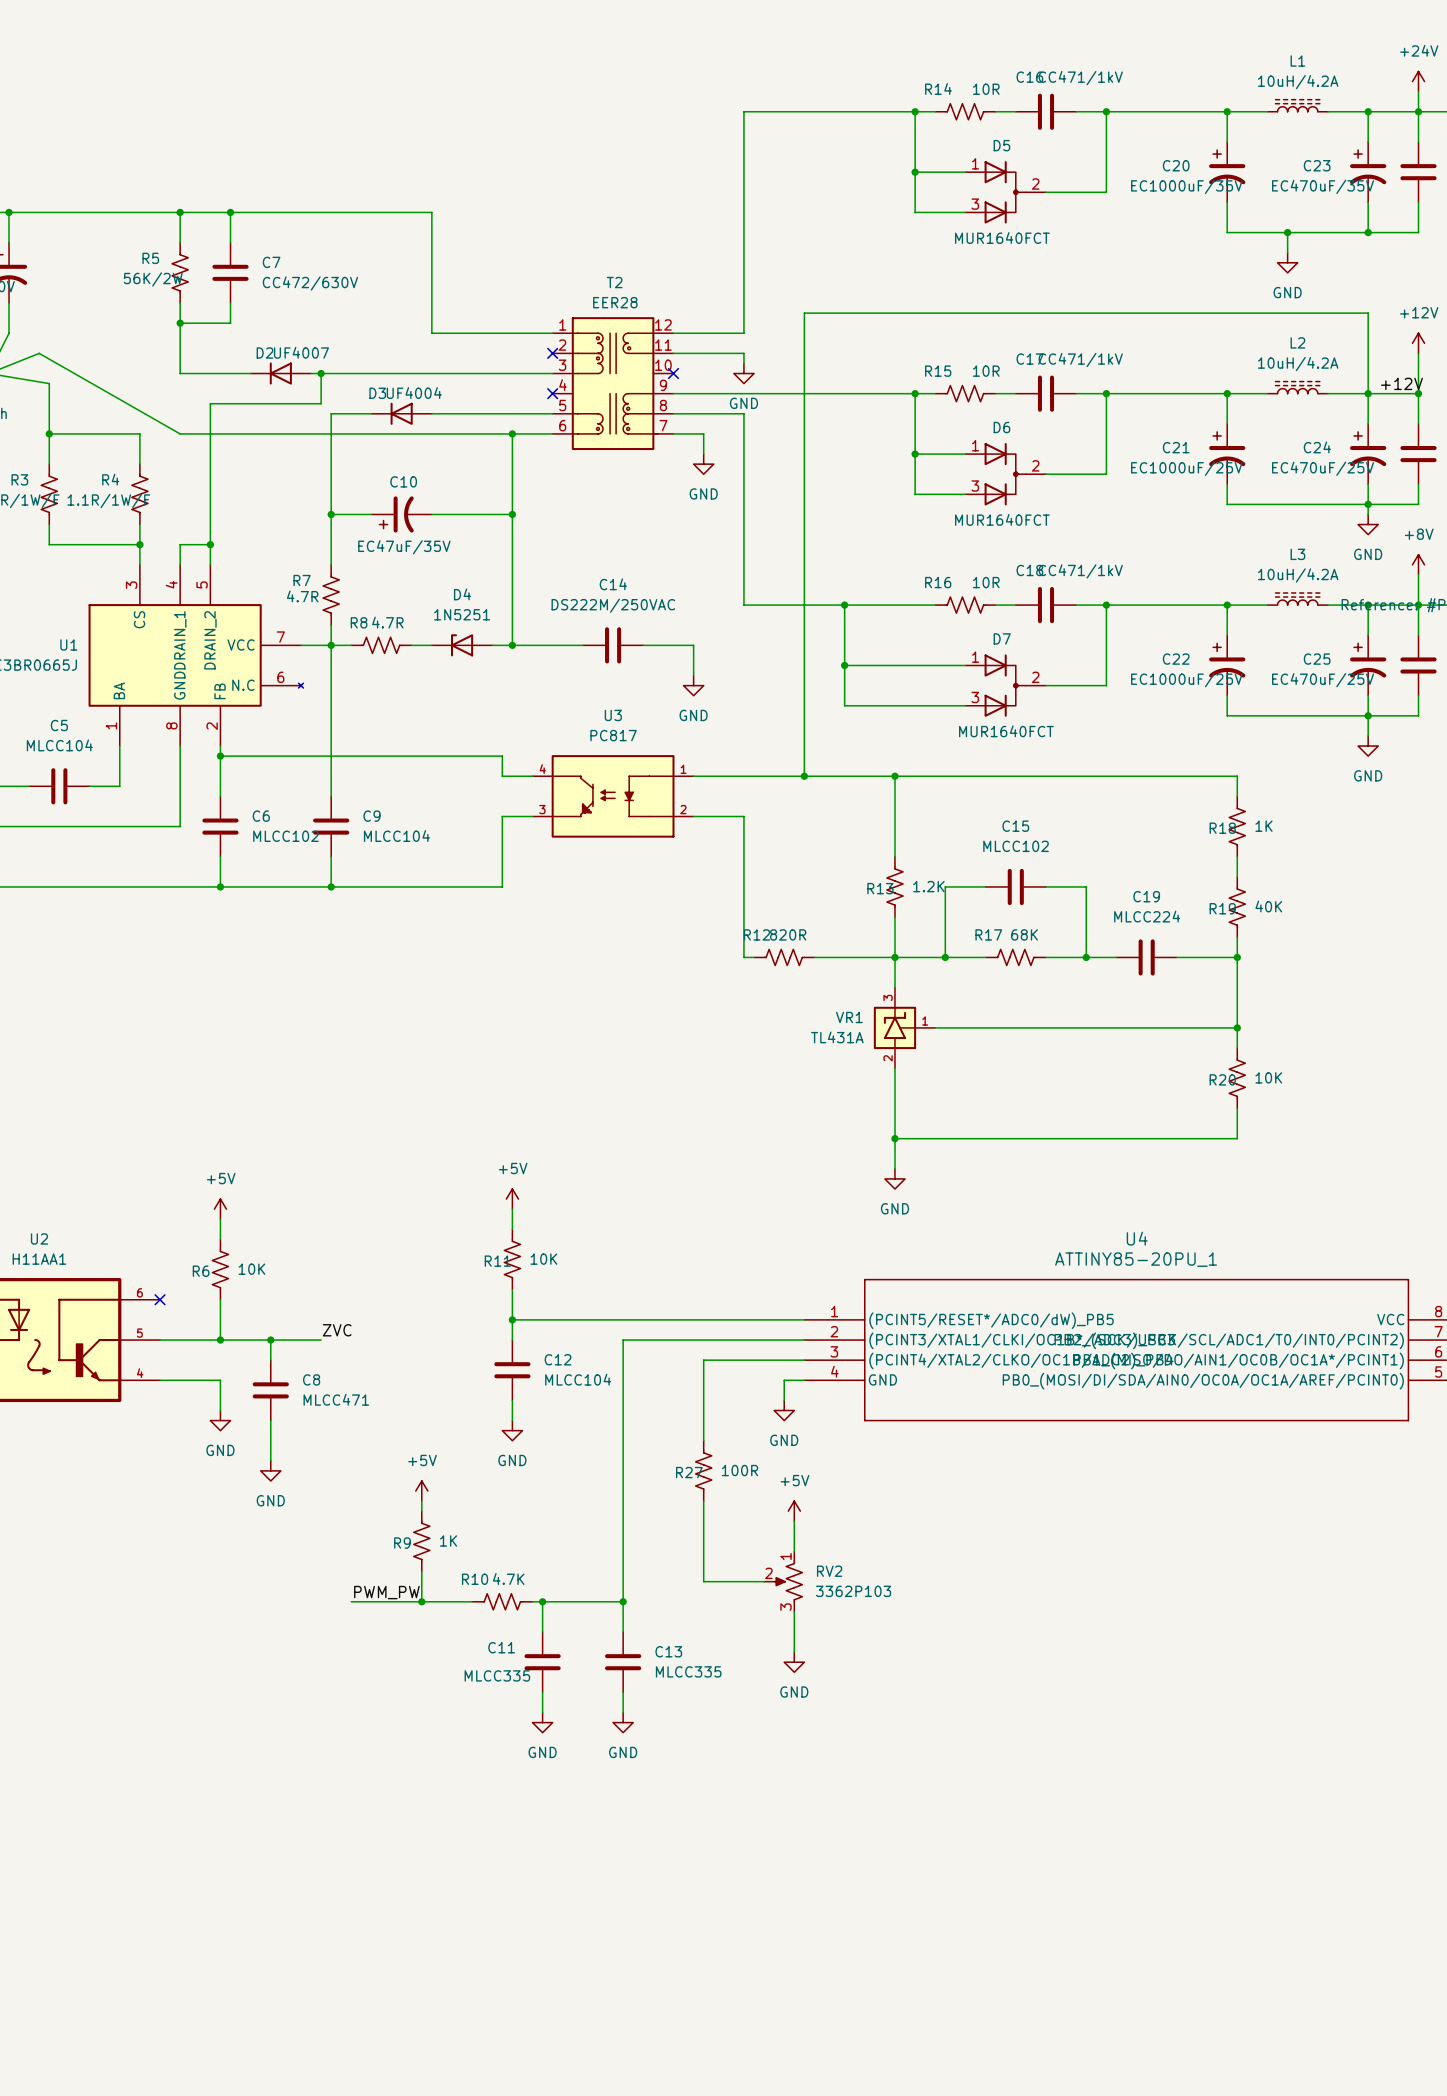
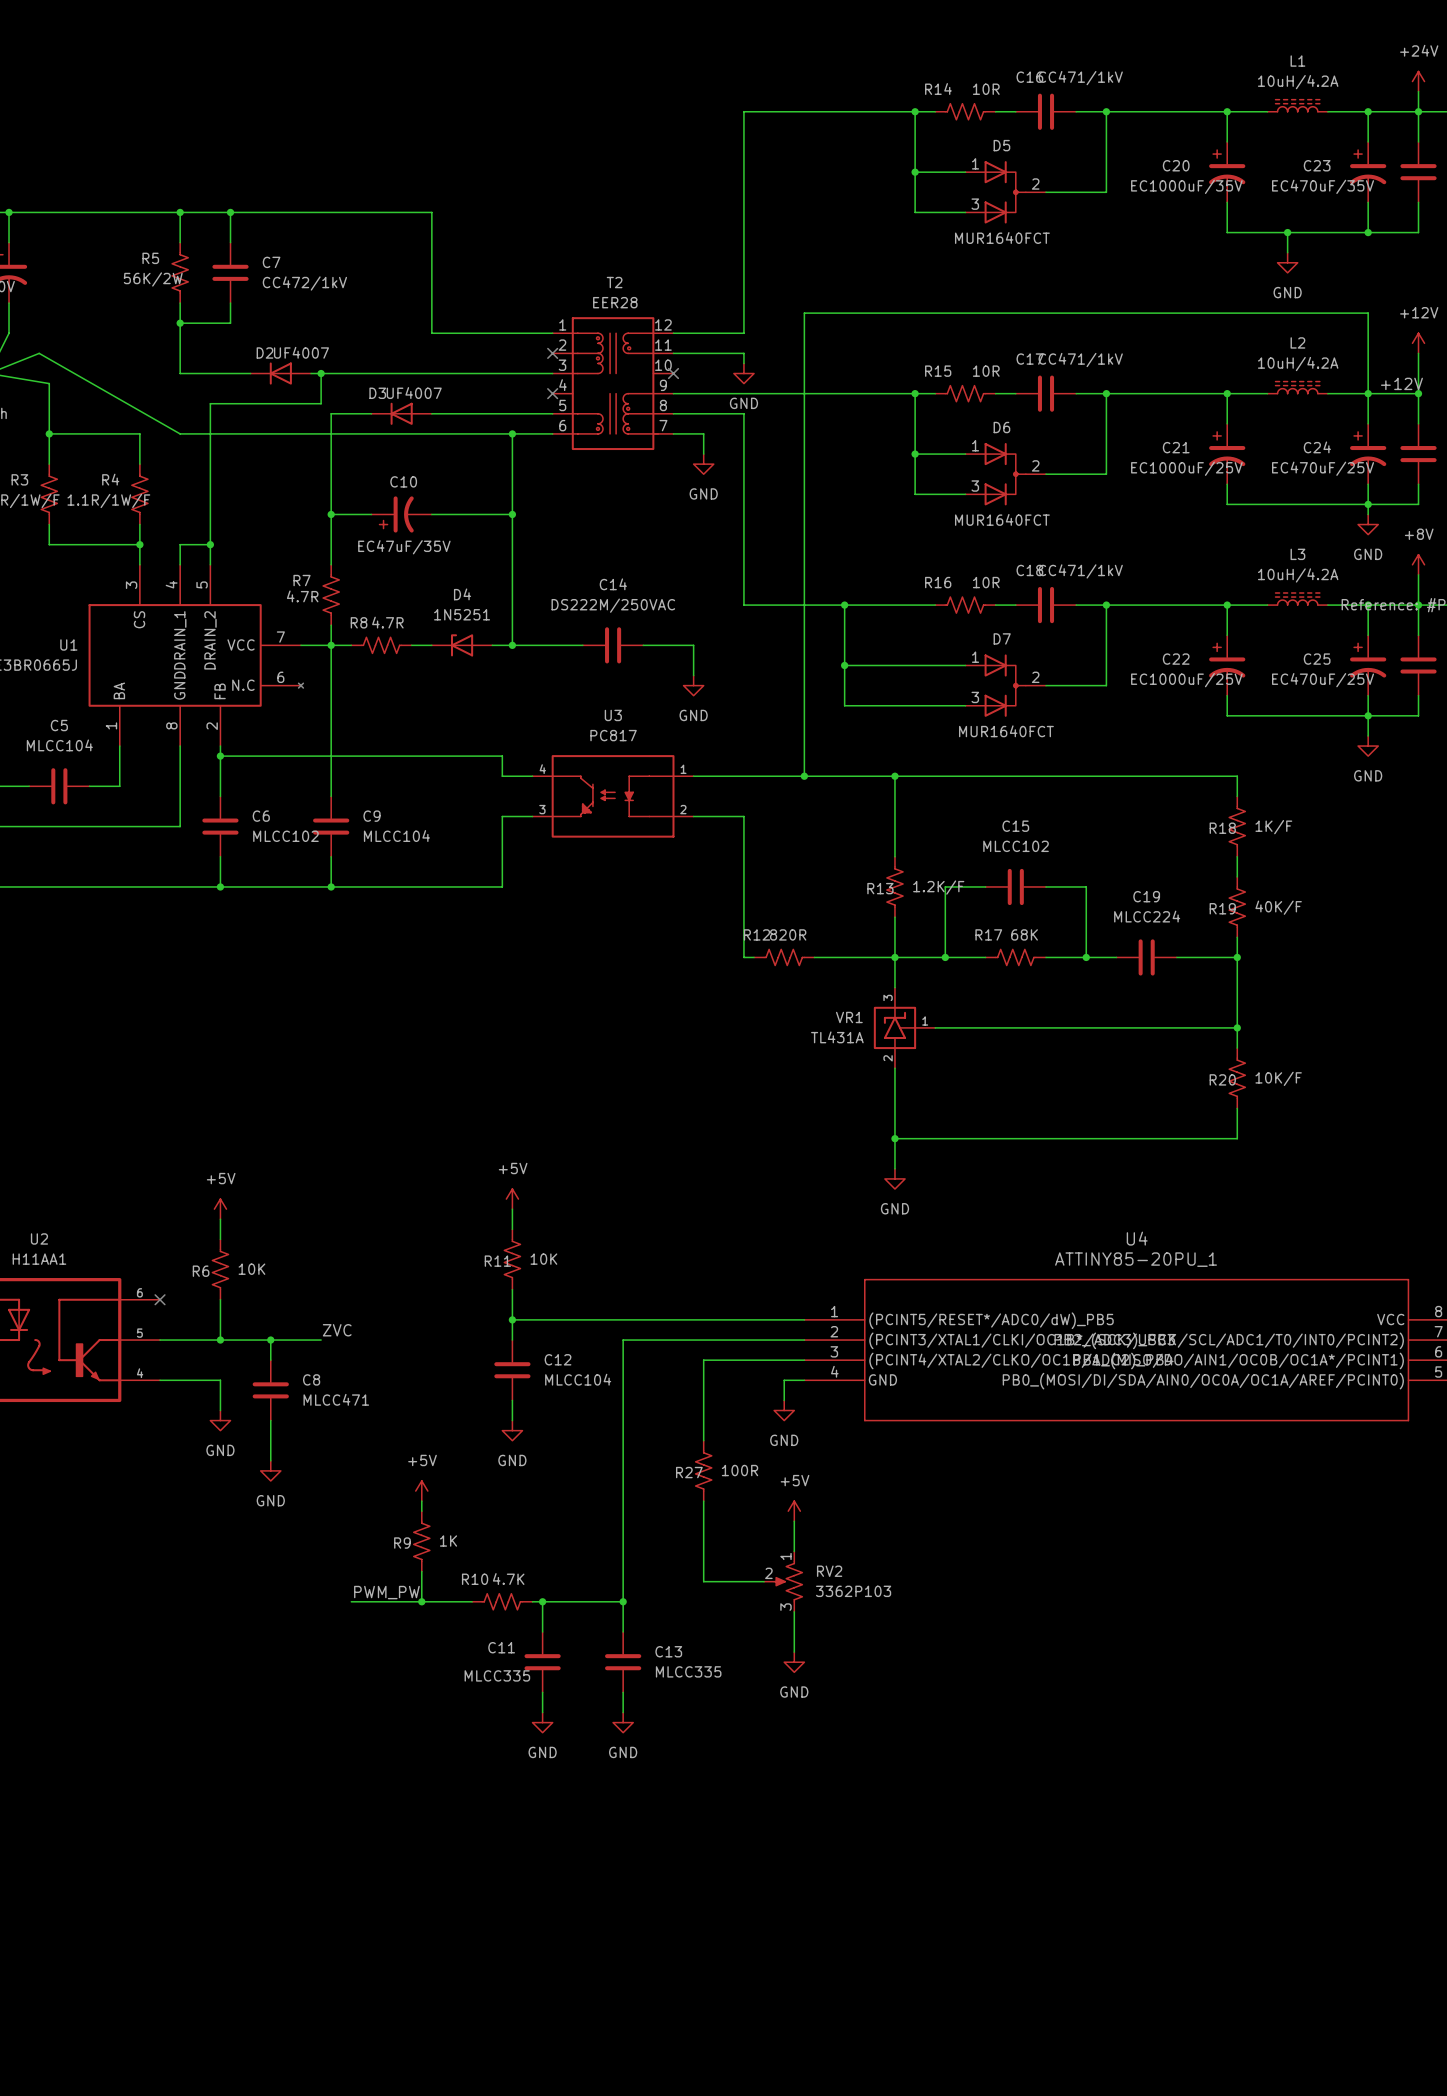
C7 value: CC472/630V (310, 283) -> CC472/1kV (304, 283)
D3 value: UF4004 (414, 393) -> UF4007 (414, 393)
R18 value: 1K (1264, 826) -> 1K/F (1273, 827)
R13 value: 1.2K (928, 886) -> 1.2K/F (938, 887)
R19 value: 40K (1268, 906) -> 40K/F (1278, 907)
R20 value: 10K (1268, 1077) -> 10K/F (1278, 1078)

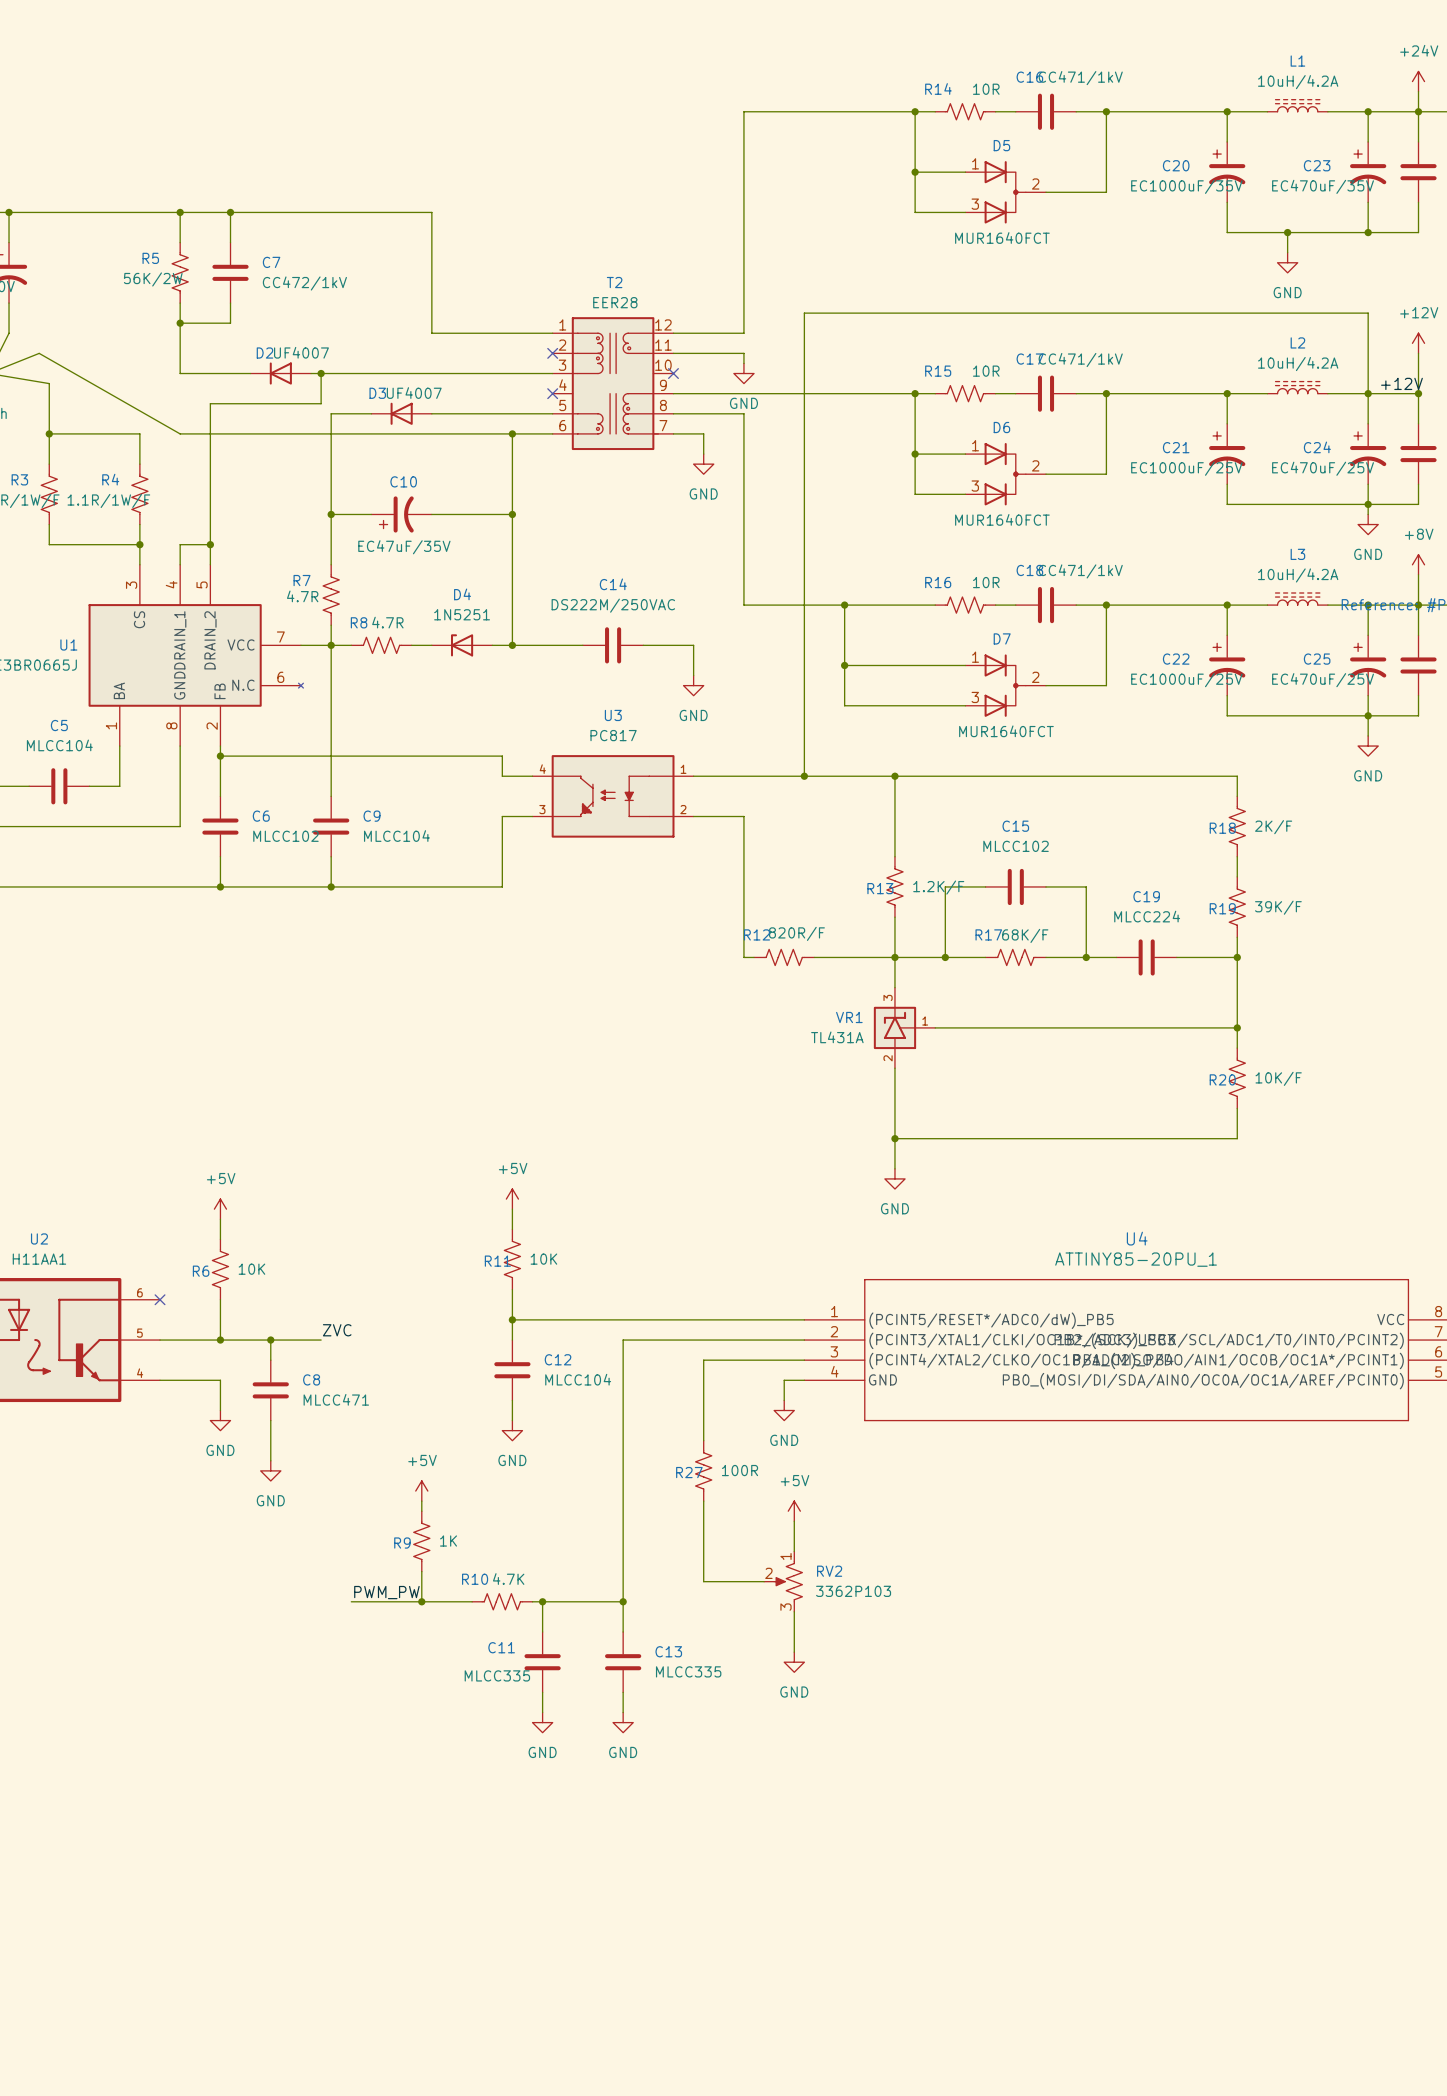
R18 value: 1K/F (1273, 827) -> 2K/F (1273, 827)
R19 value: 40K/F (1278, 907) -> 39K/F (1278, 907)
R12 value: 820R (788, 934) -> 820R/F (796, 933)
R17 value: 68K (1024, 934) -> 68K/F (1025, 935)

